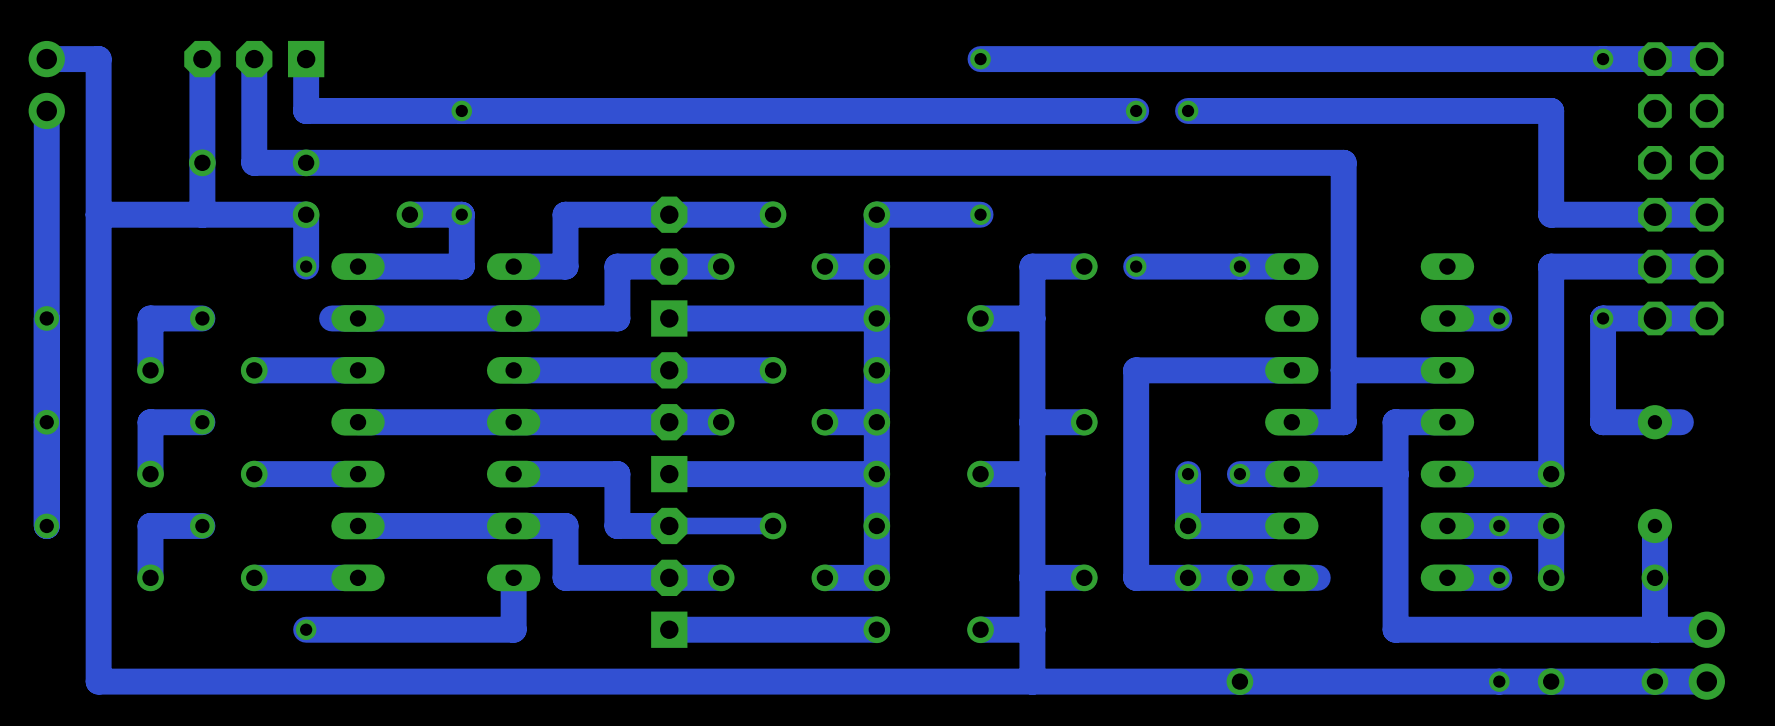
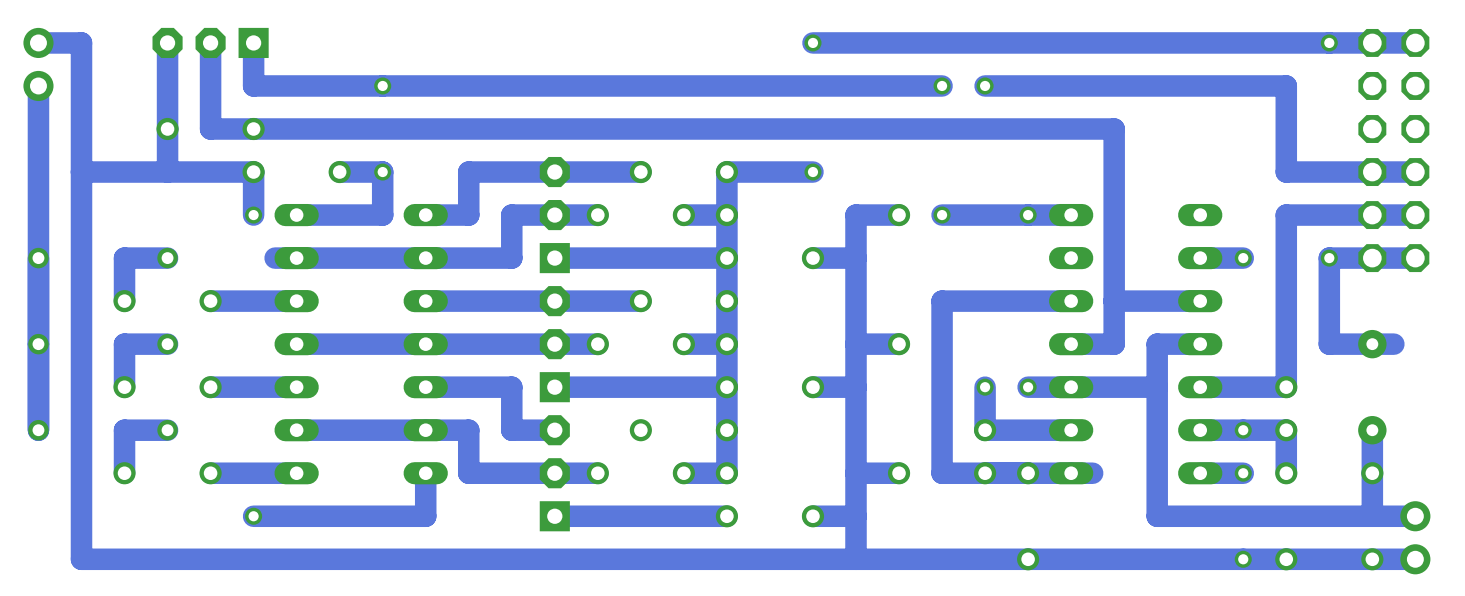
track: (773, 525) (669, 525) -> none

